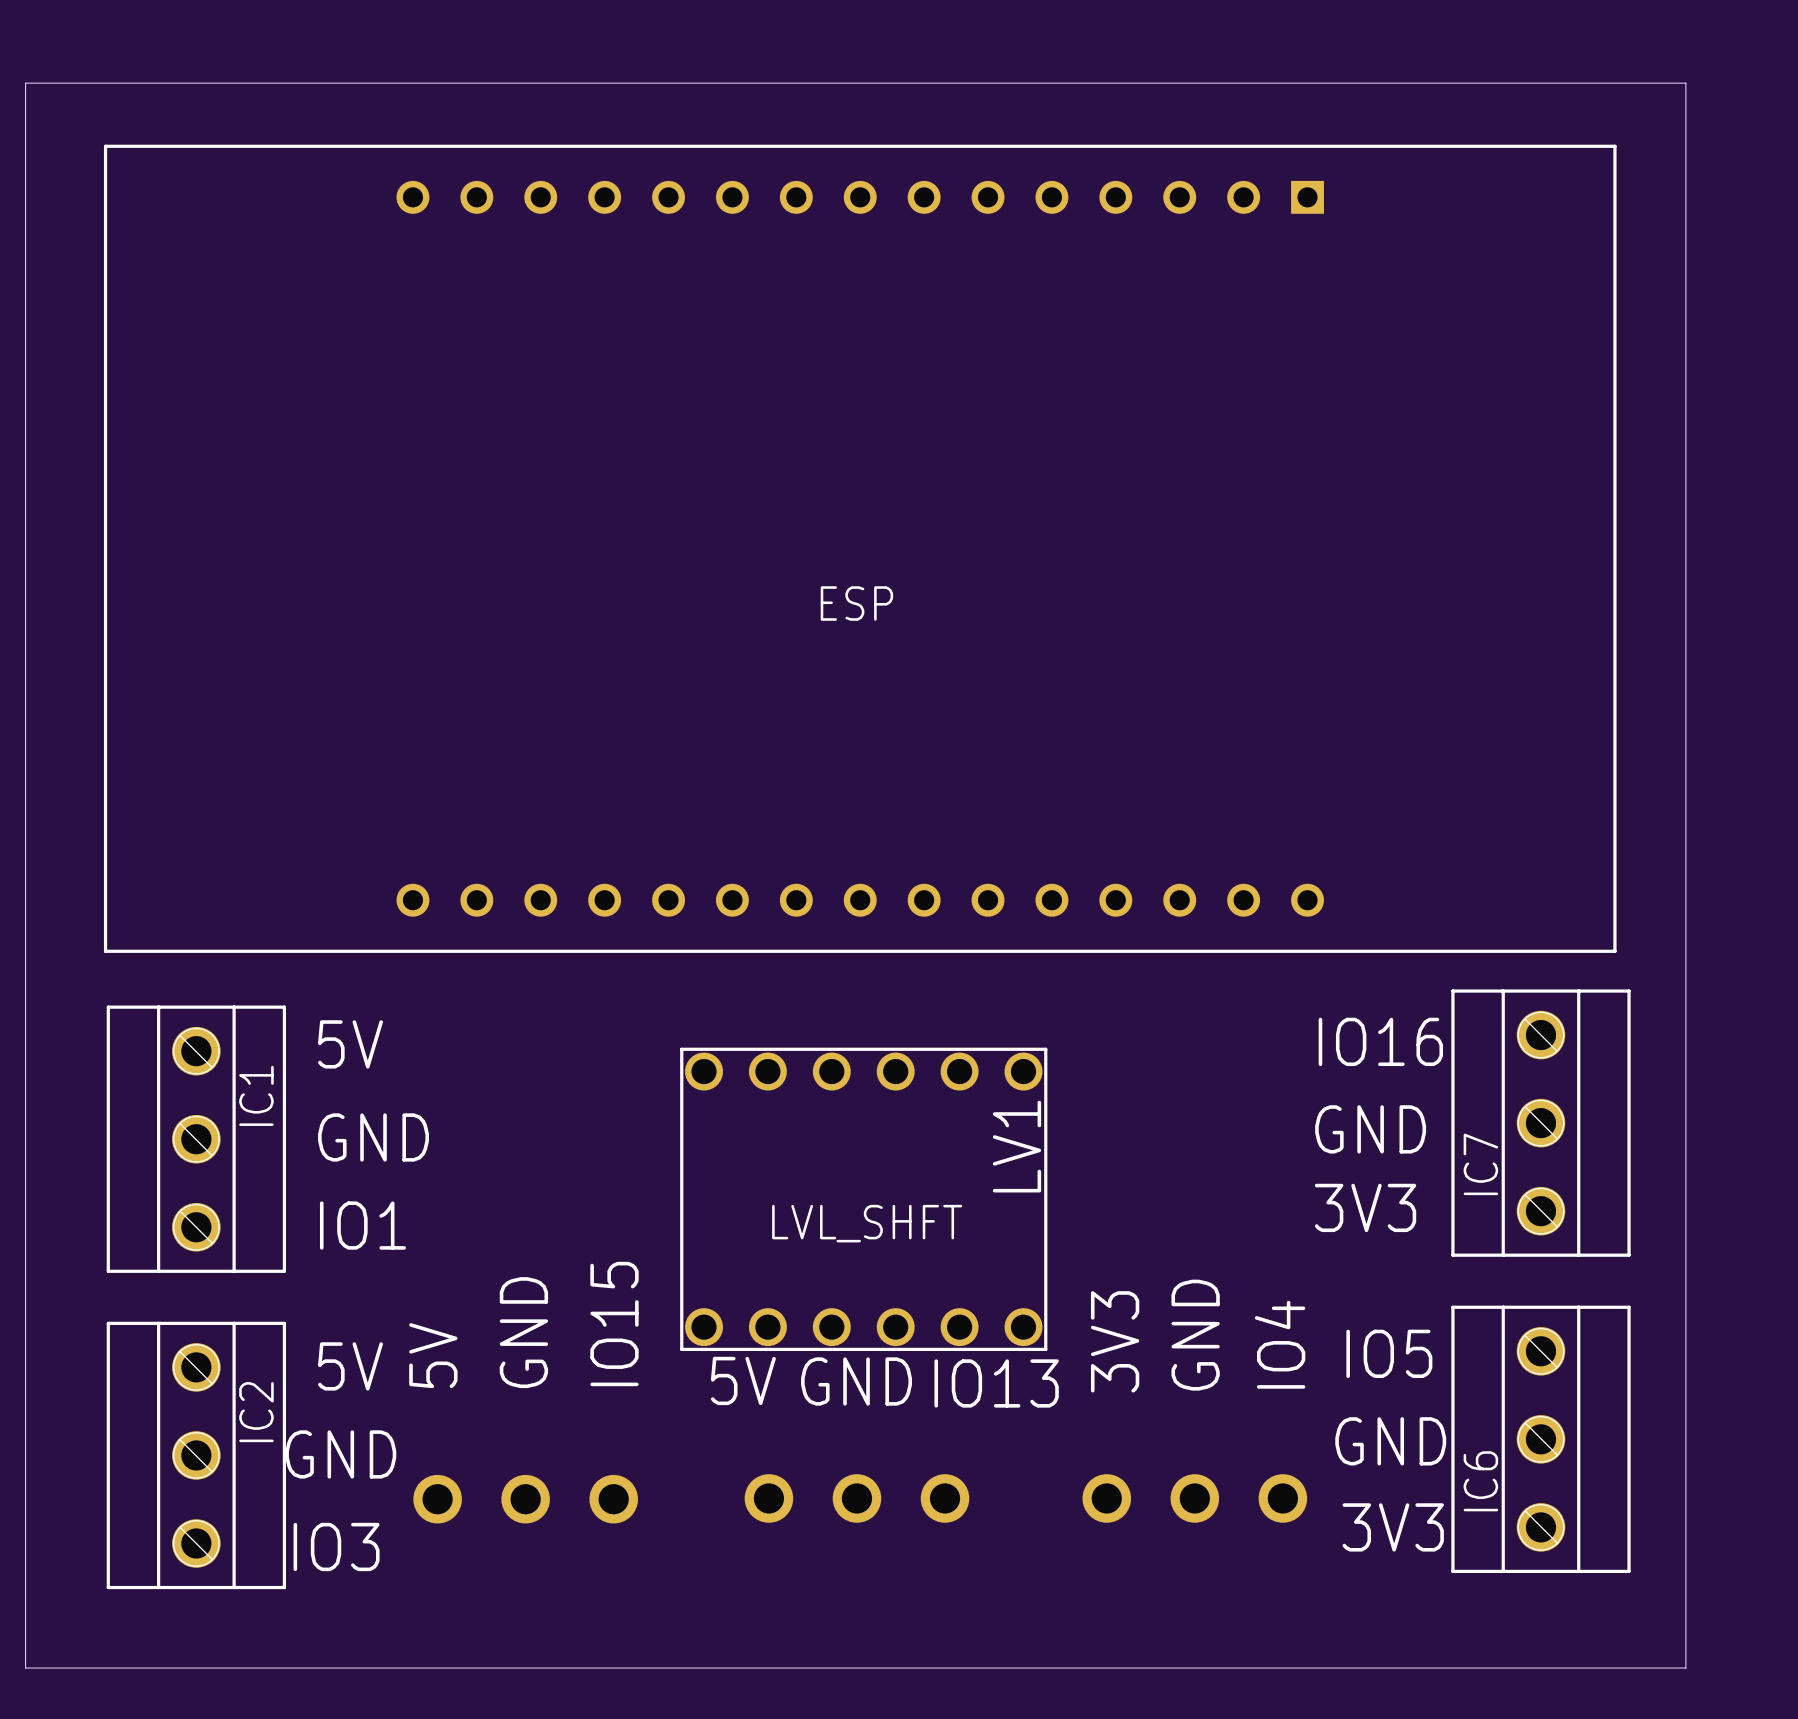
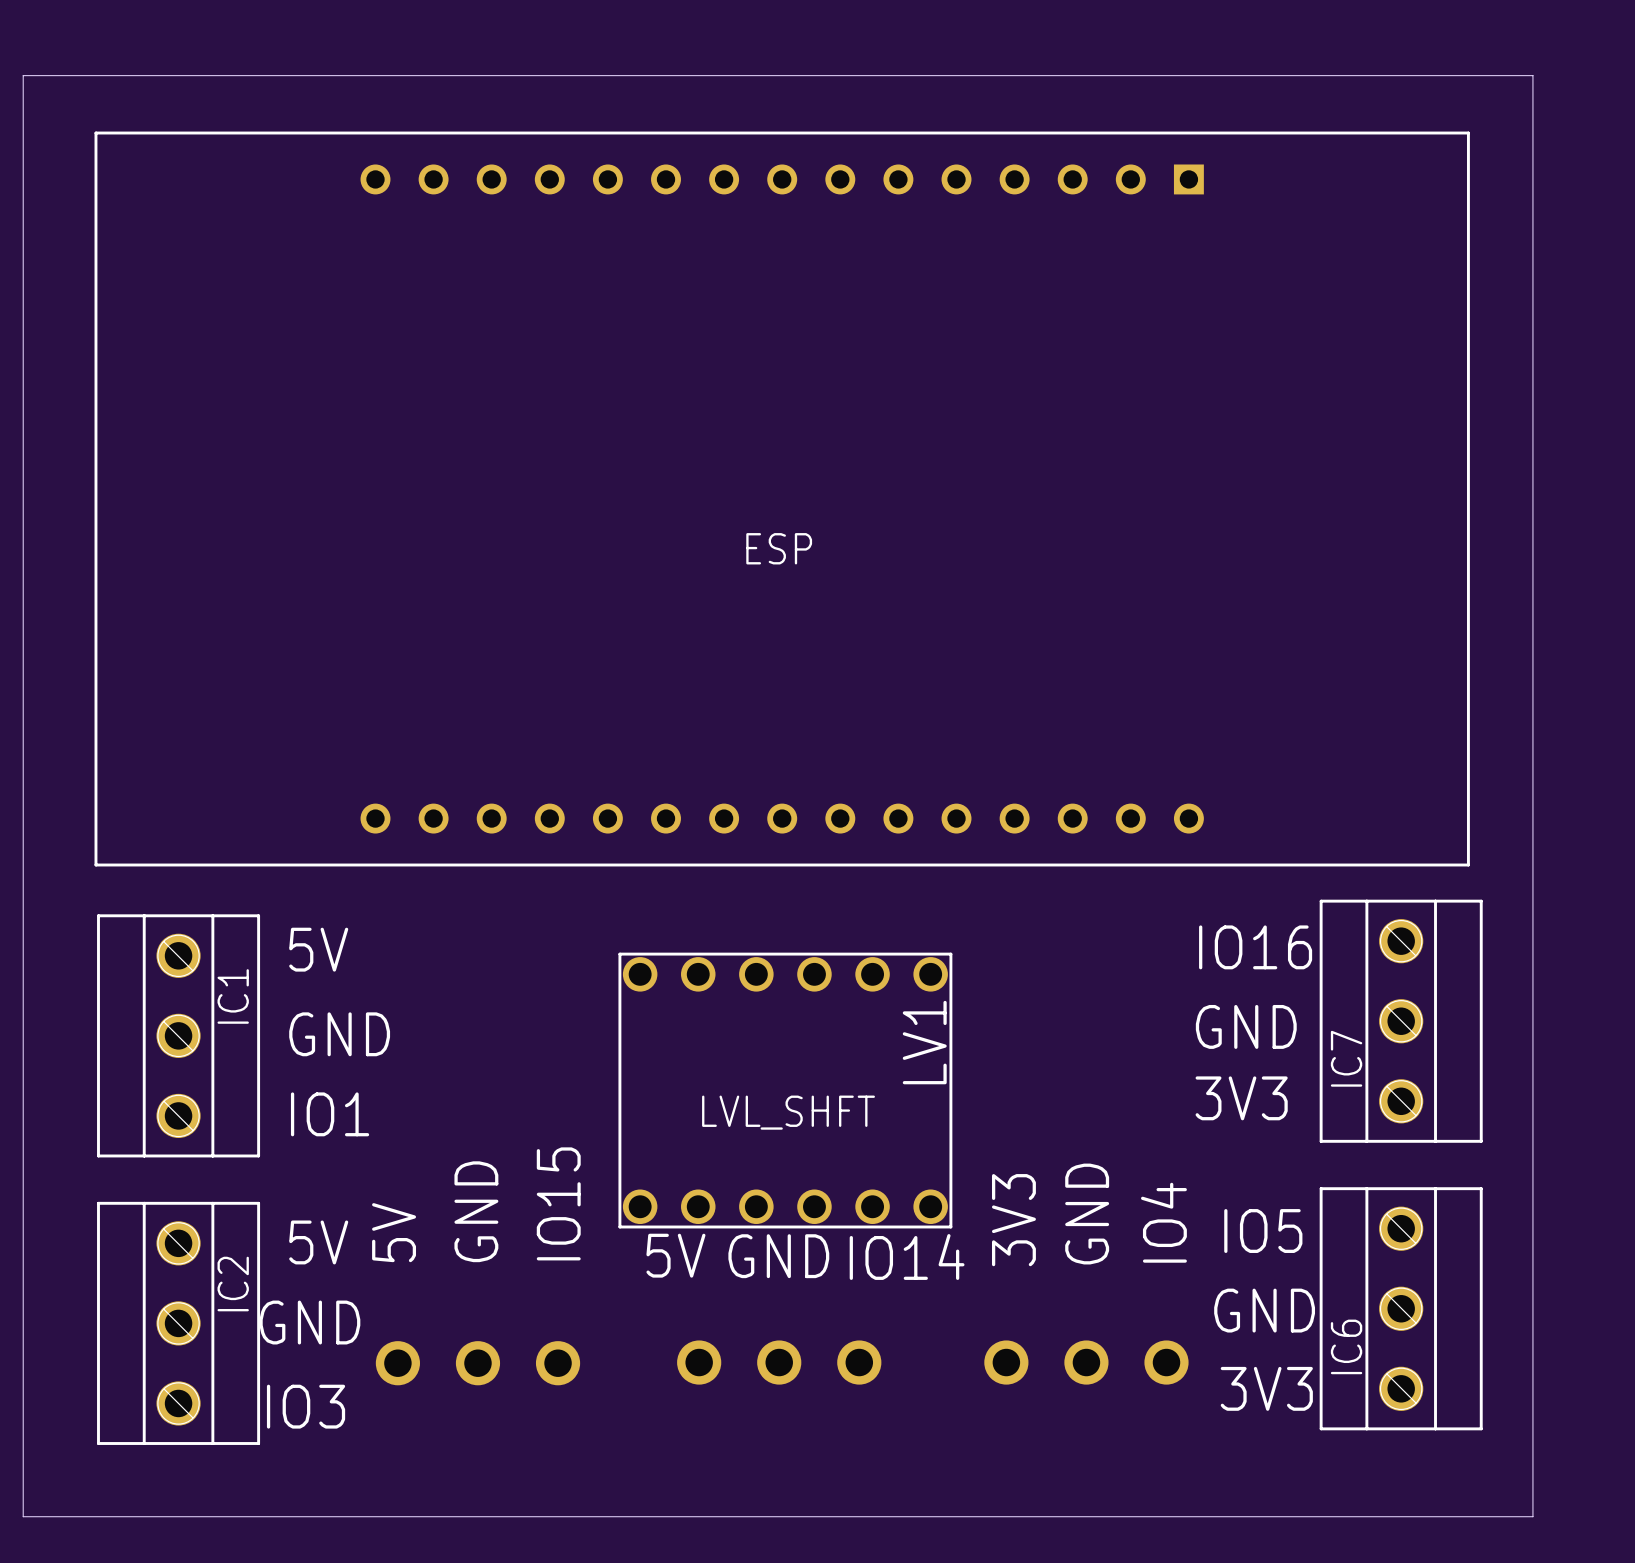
text: IO13 (996, 1383) -> IO14 (907, 1257)

